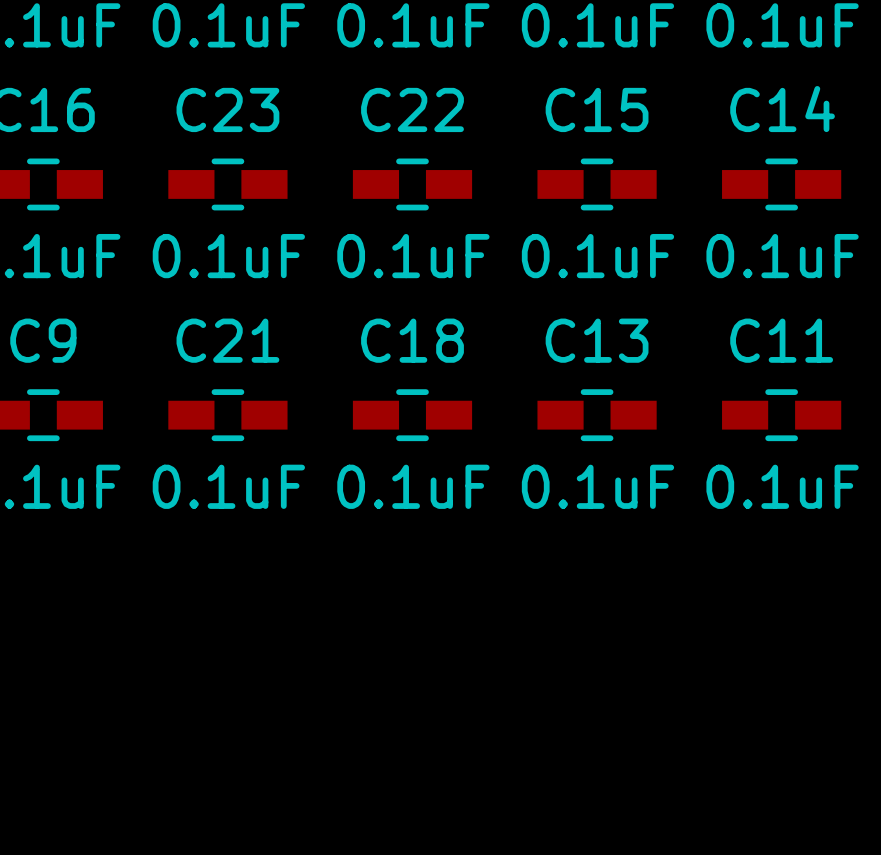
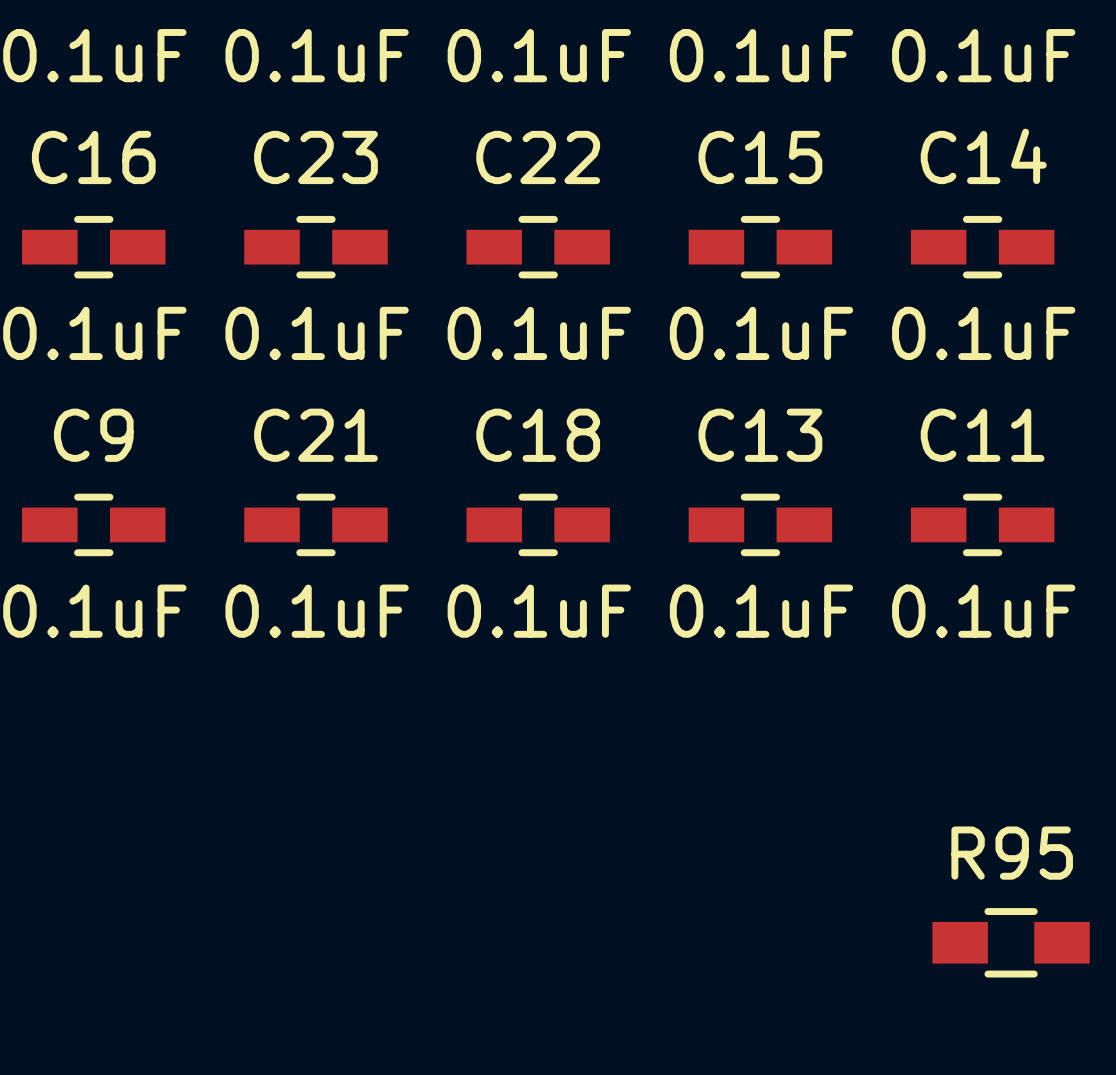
R95: none -> (1011, 942)

